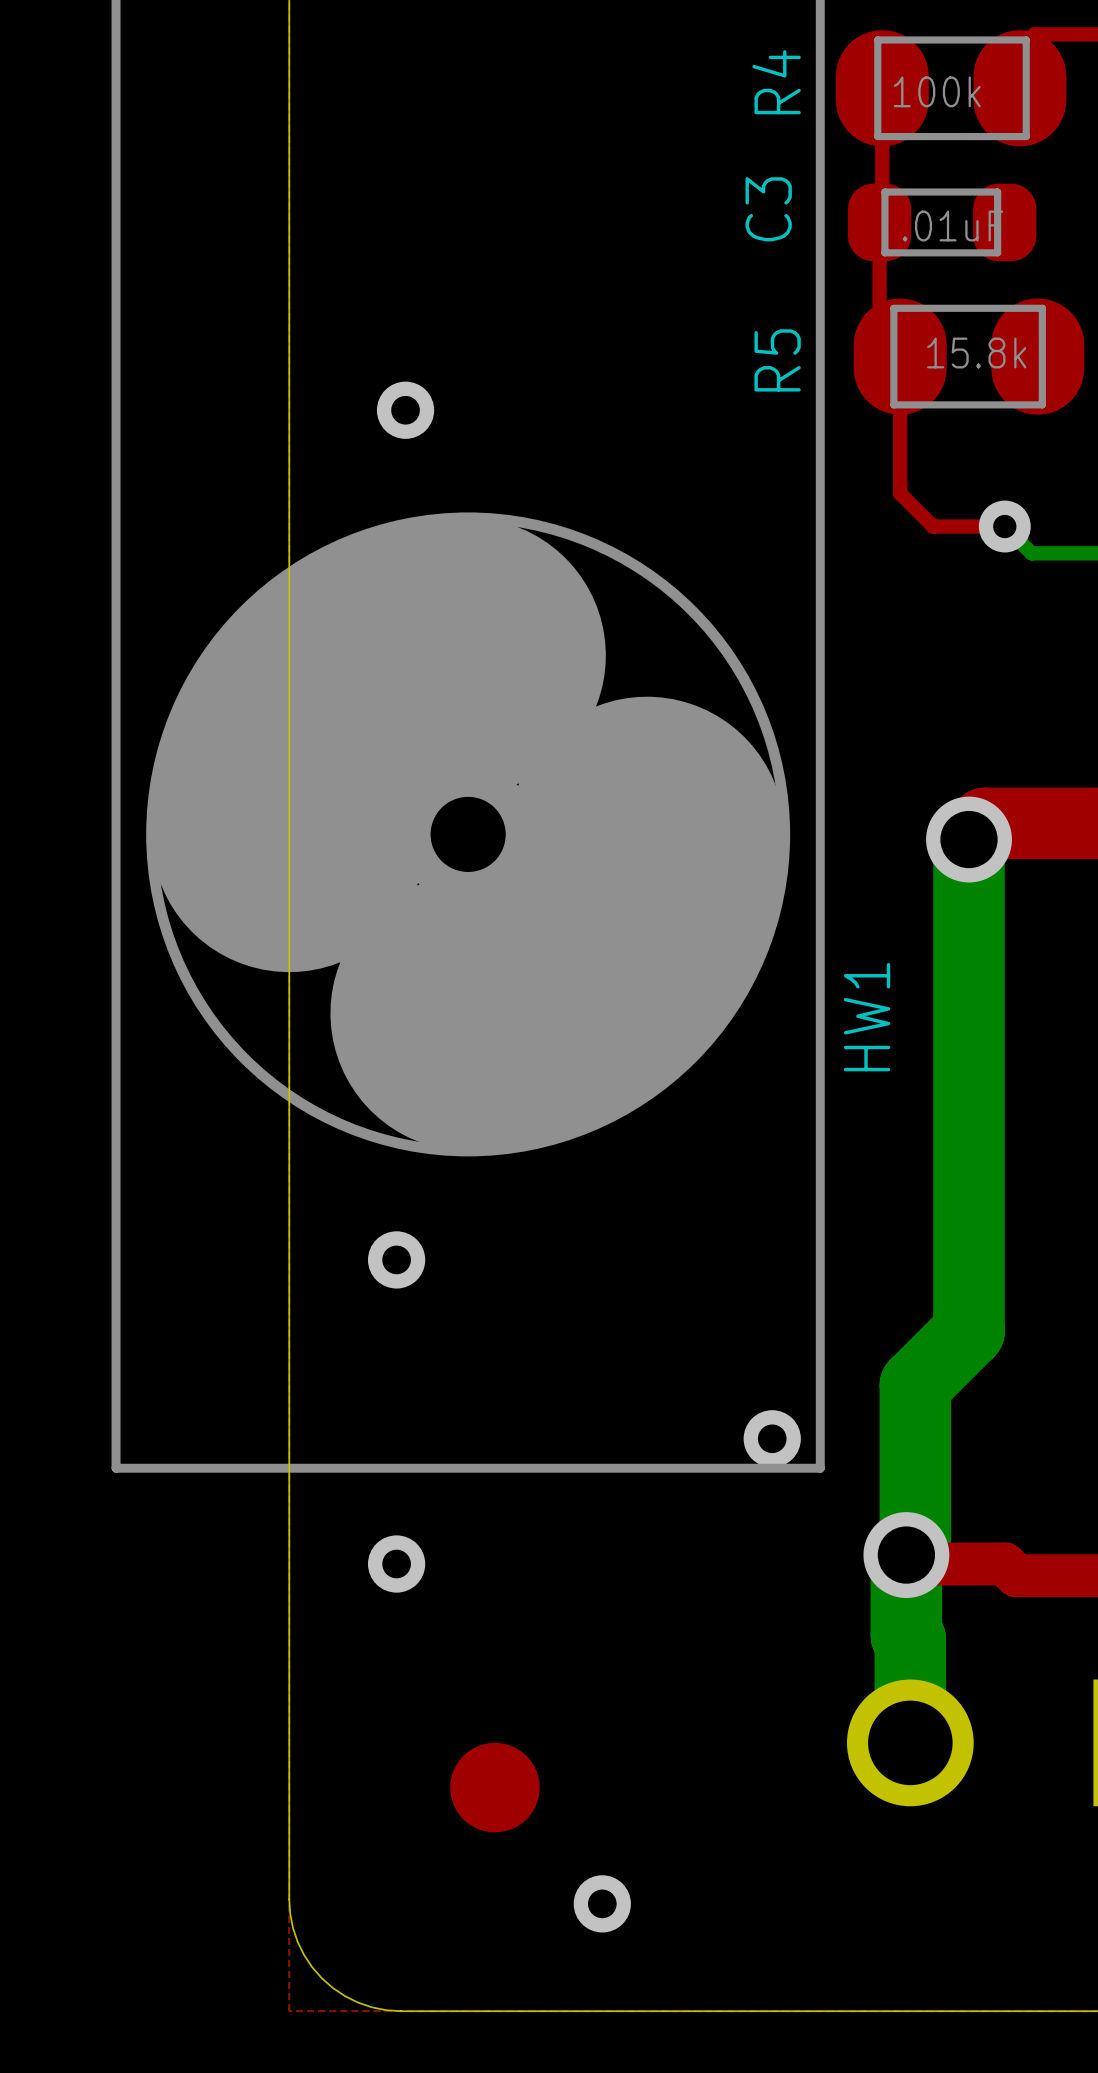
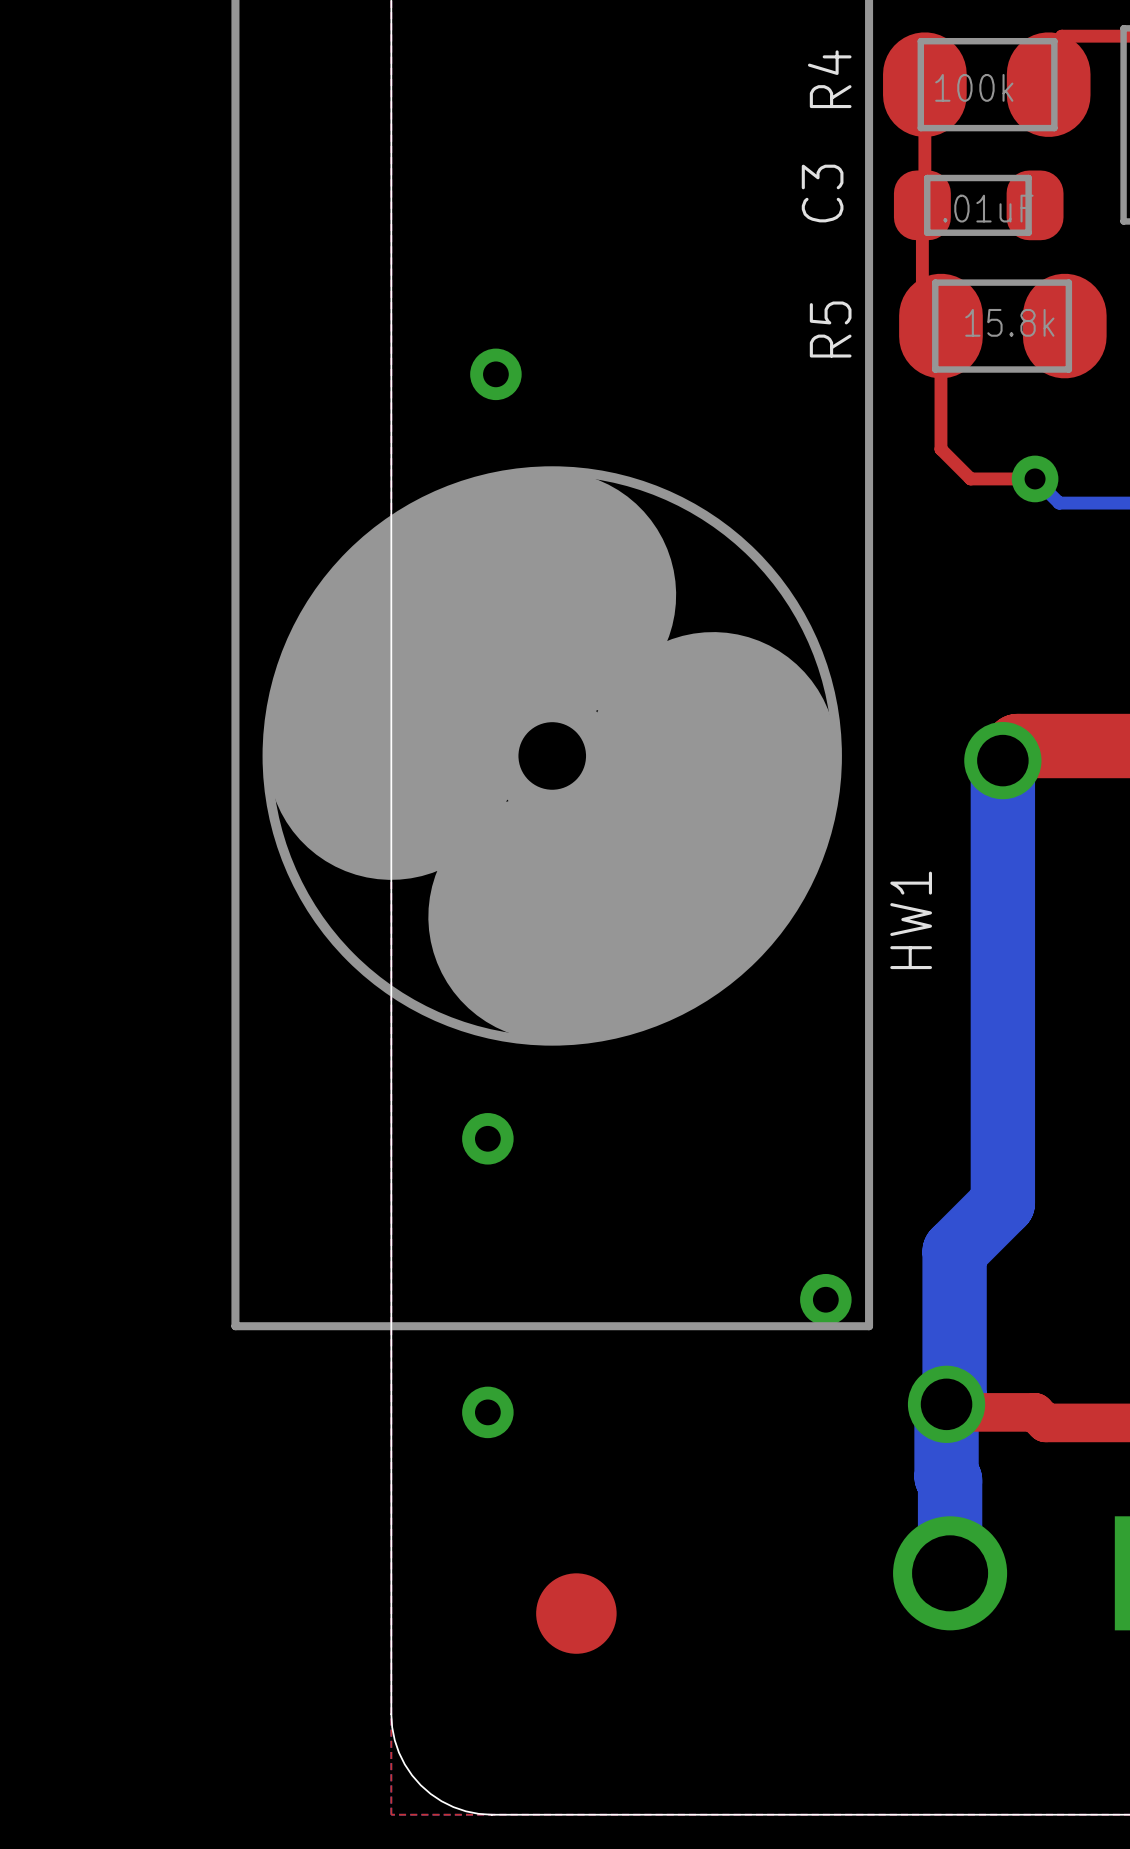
via: (602, 1903) -> none

